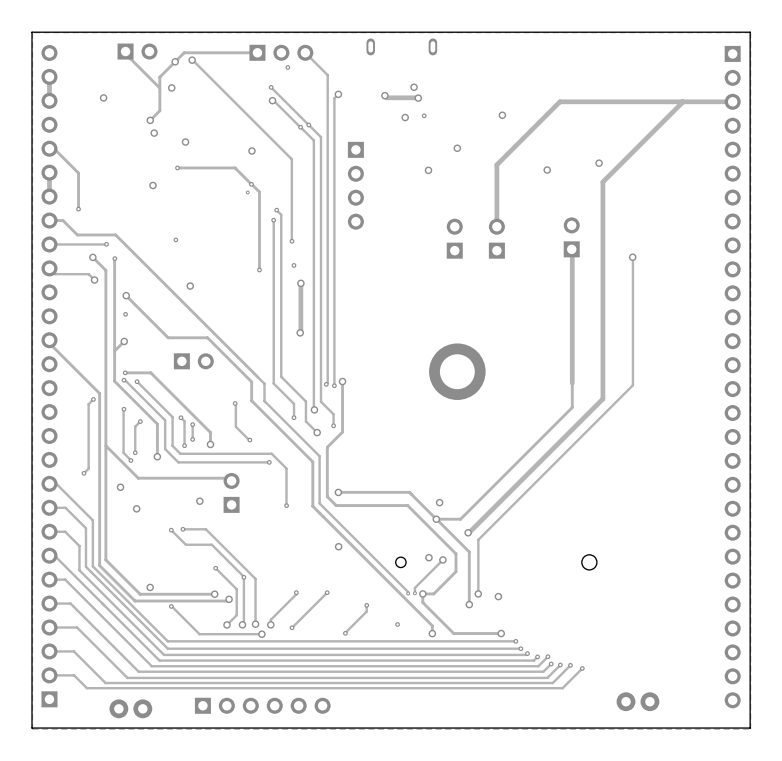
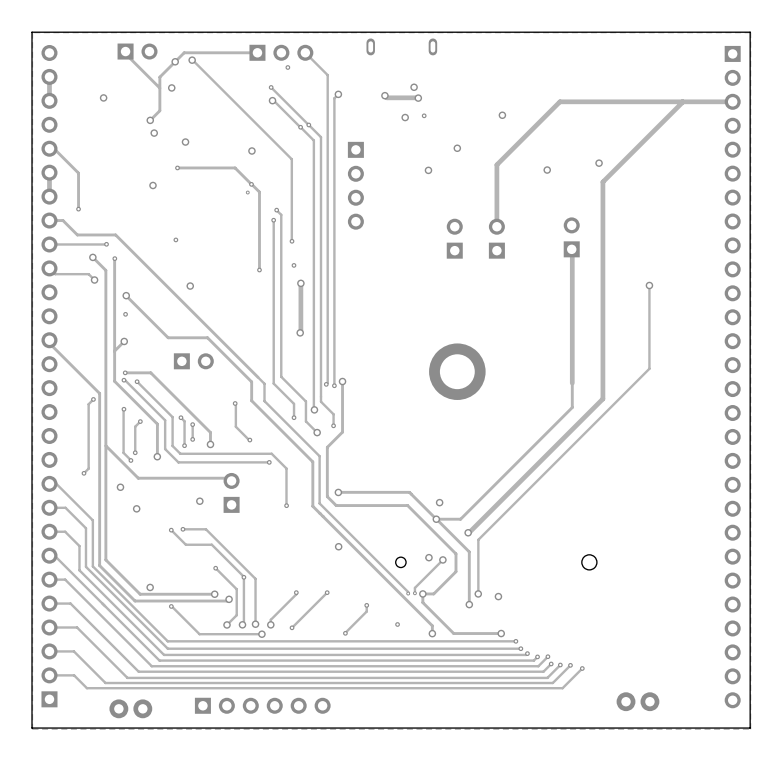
track: (632, 257) (632, 385) -> (649, 285) (649, 368) (632, 385)
via position: (632, 257) -> (649, 285)

